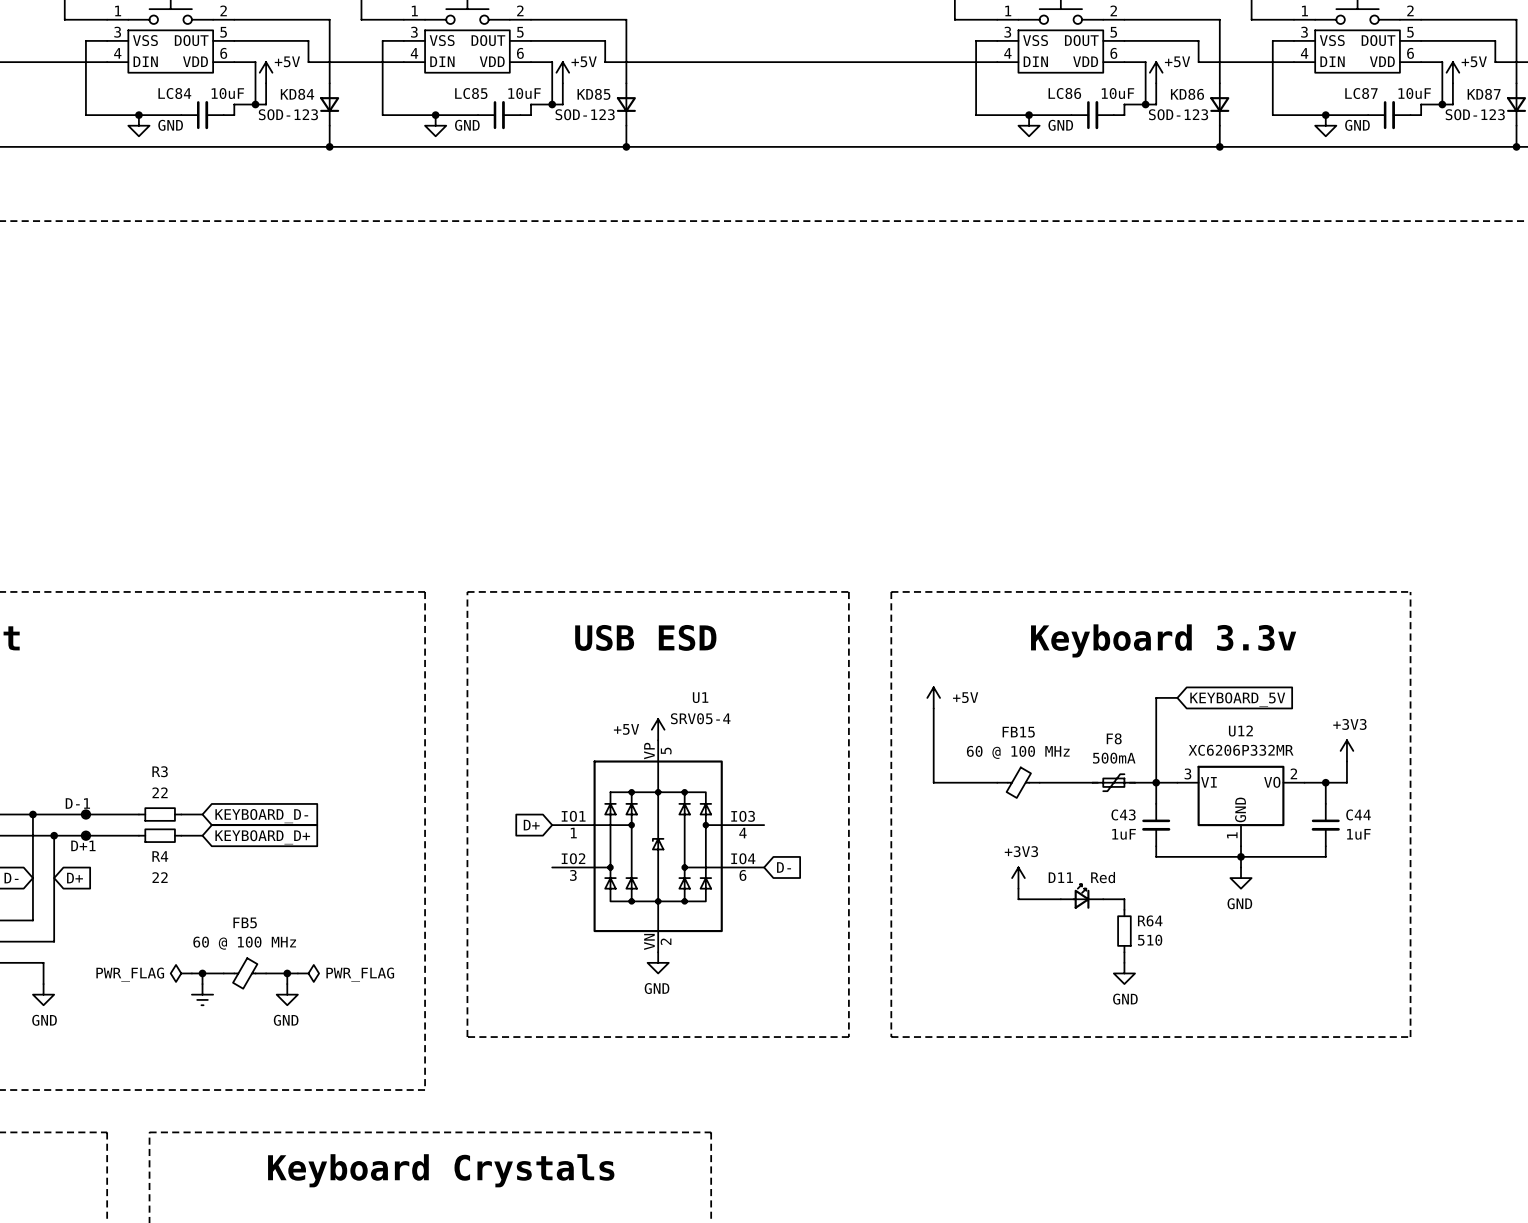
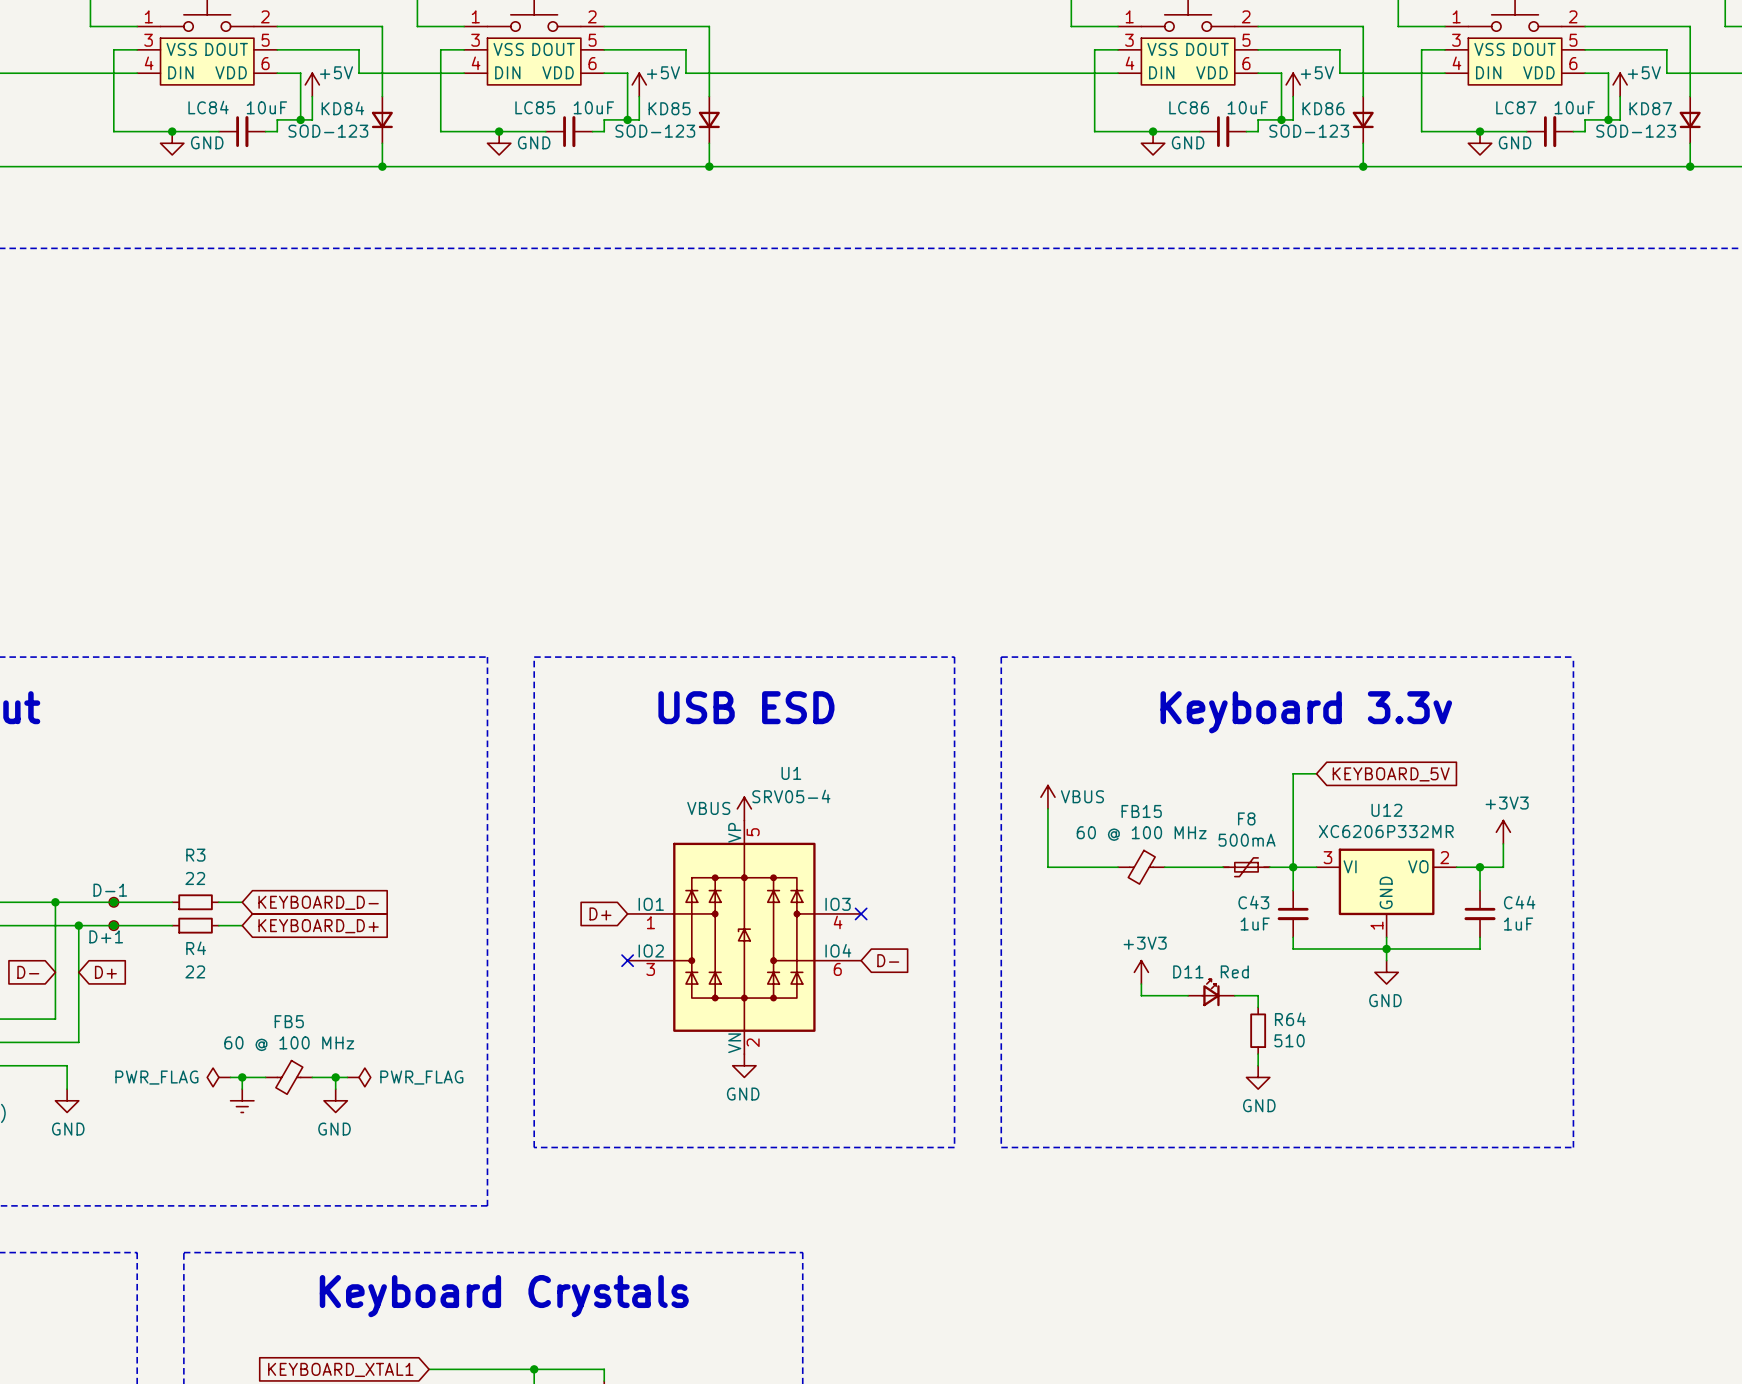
power symbol: +5V (933, 697) -> none
power symbol: none -> VBUS (1047, 797)
power symbol: +5V (658, 729) -> VBUS (744, 808)
no-connect mark: none -> (861, 913)
no-connect mark: none -> (627, 960)

